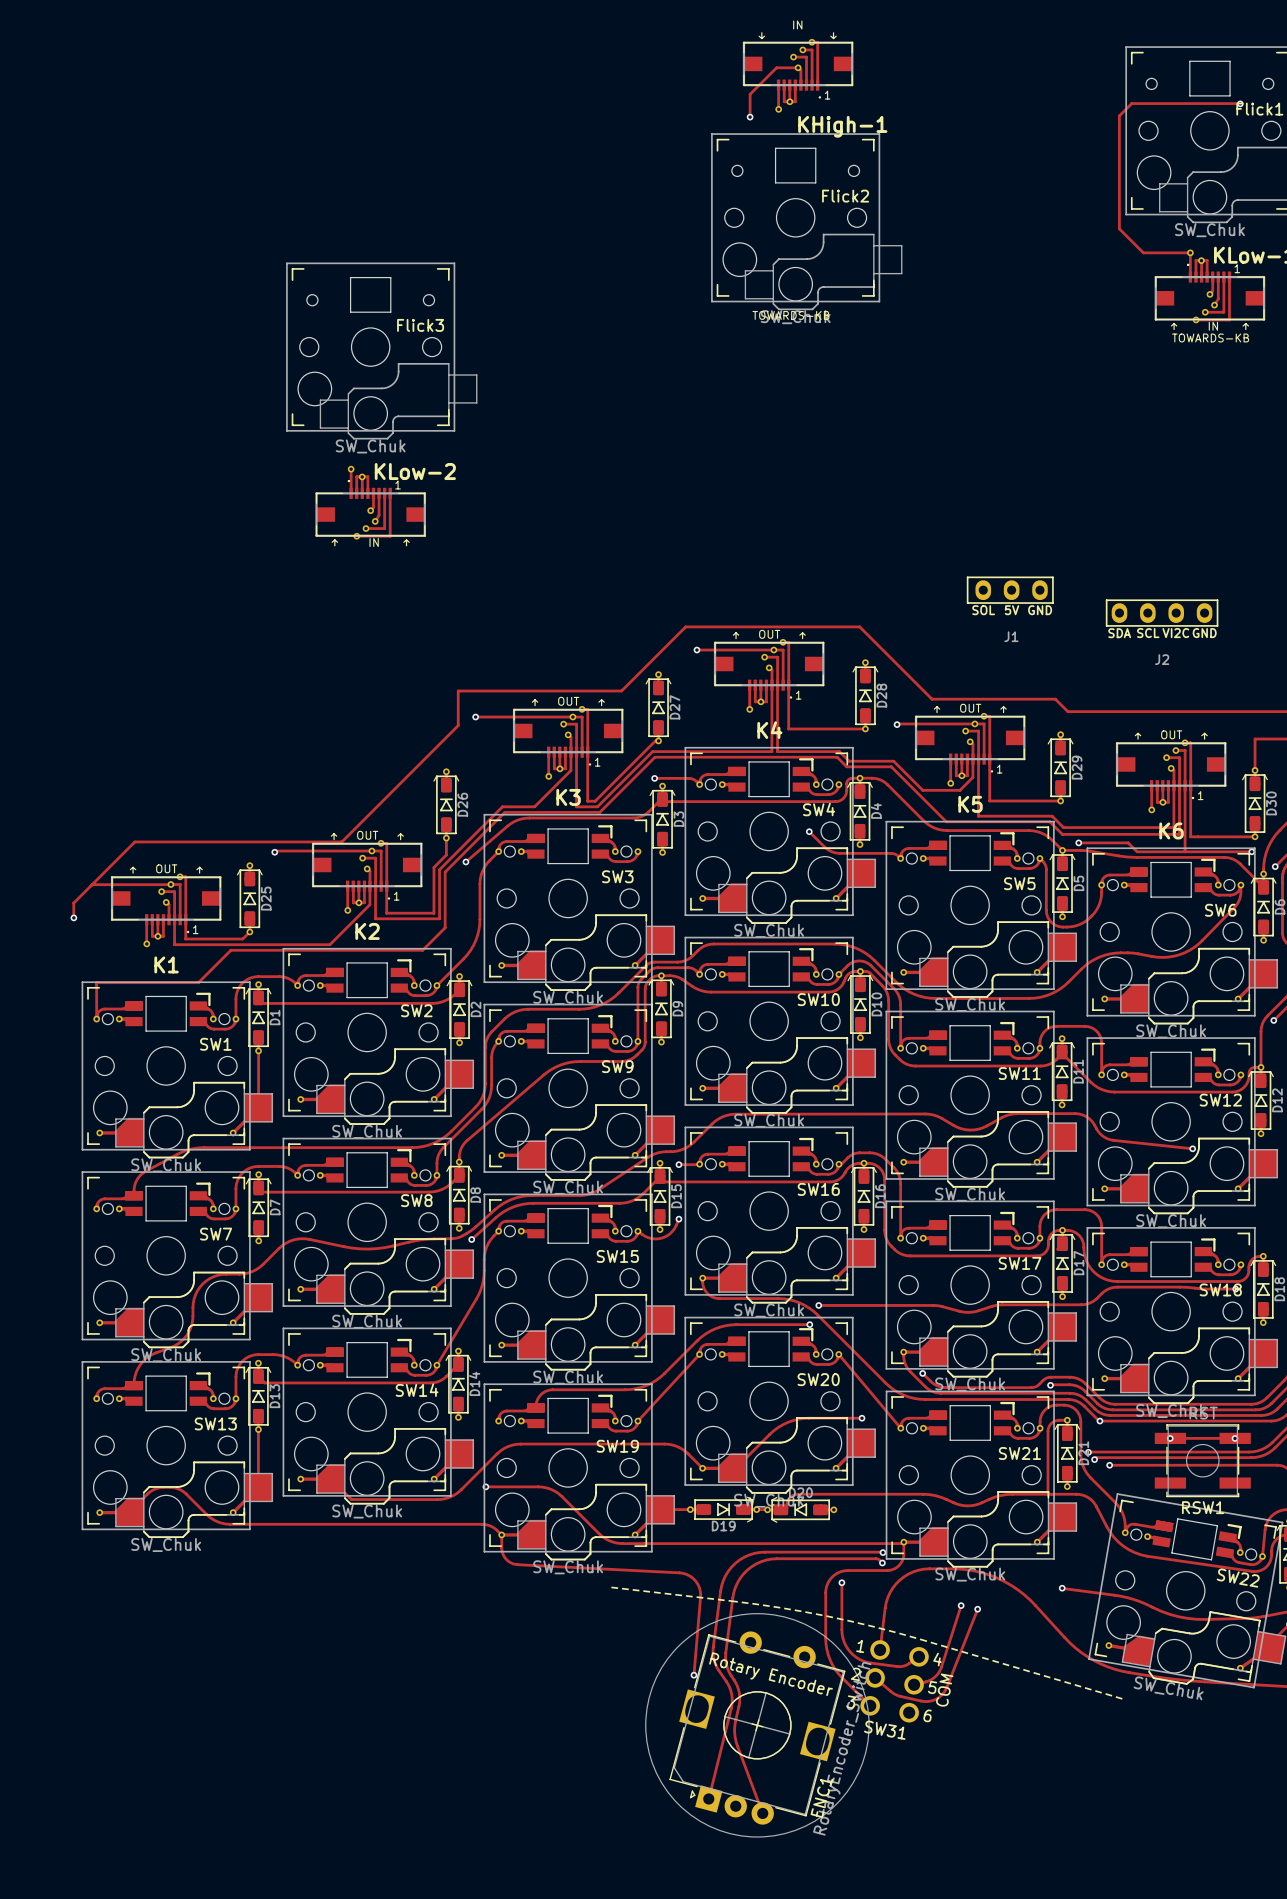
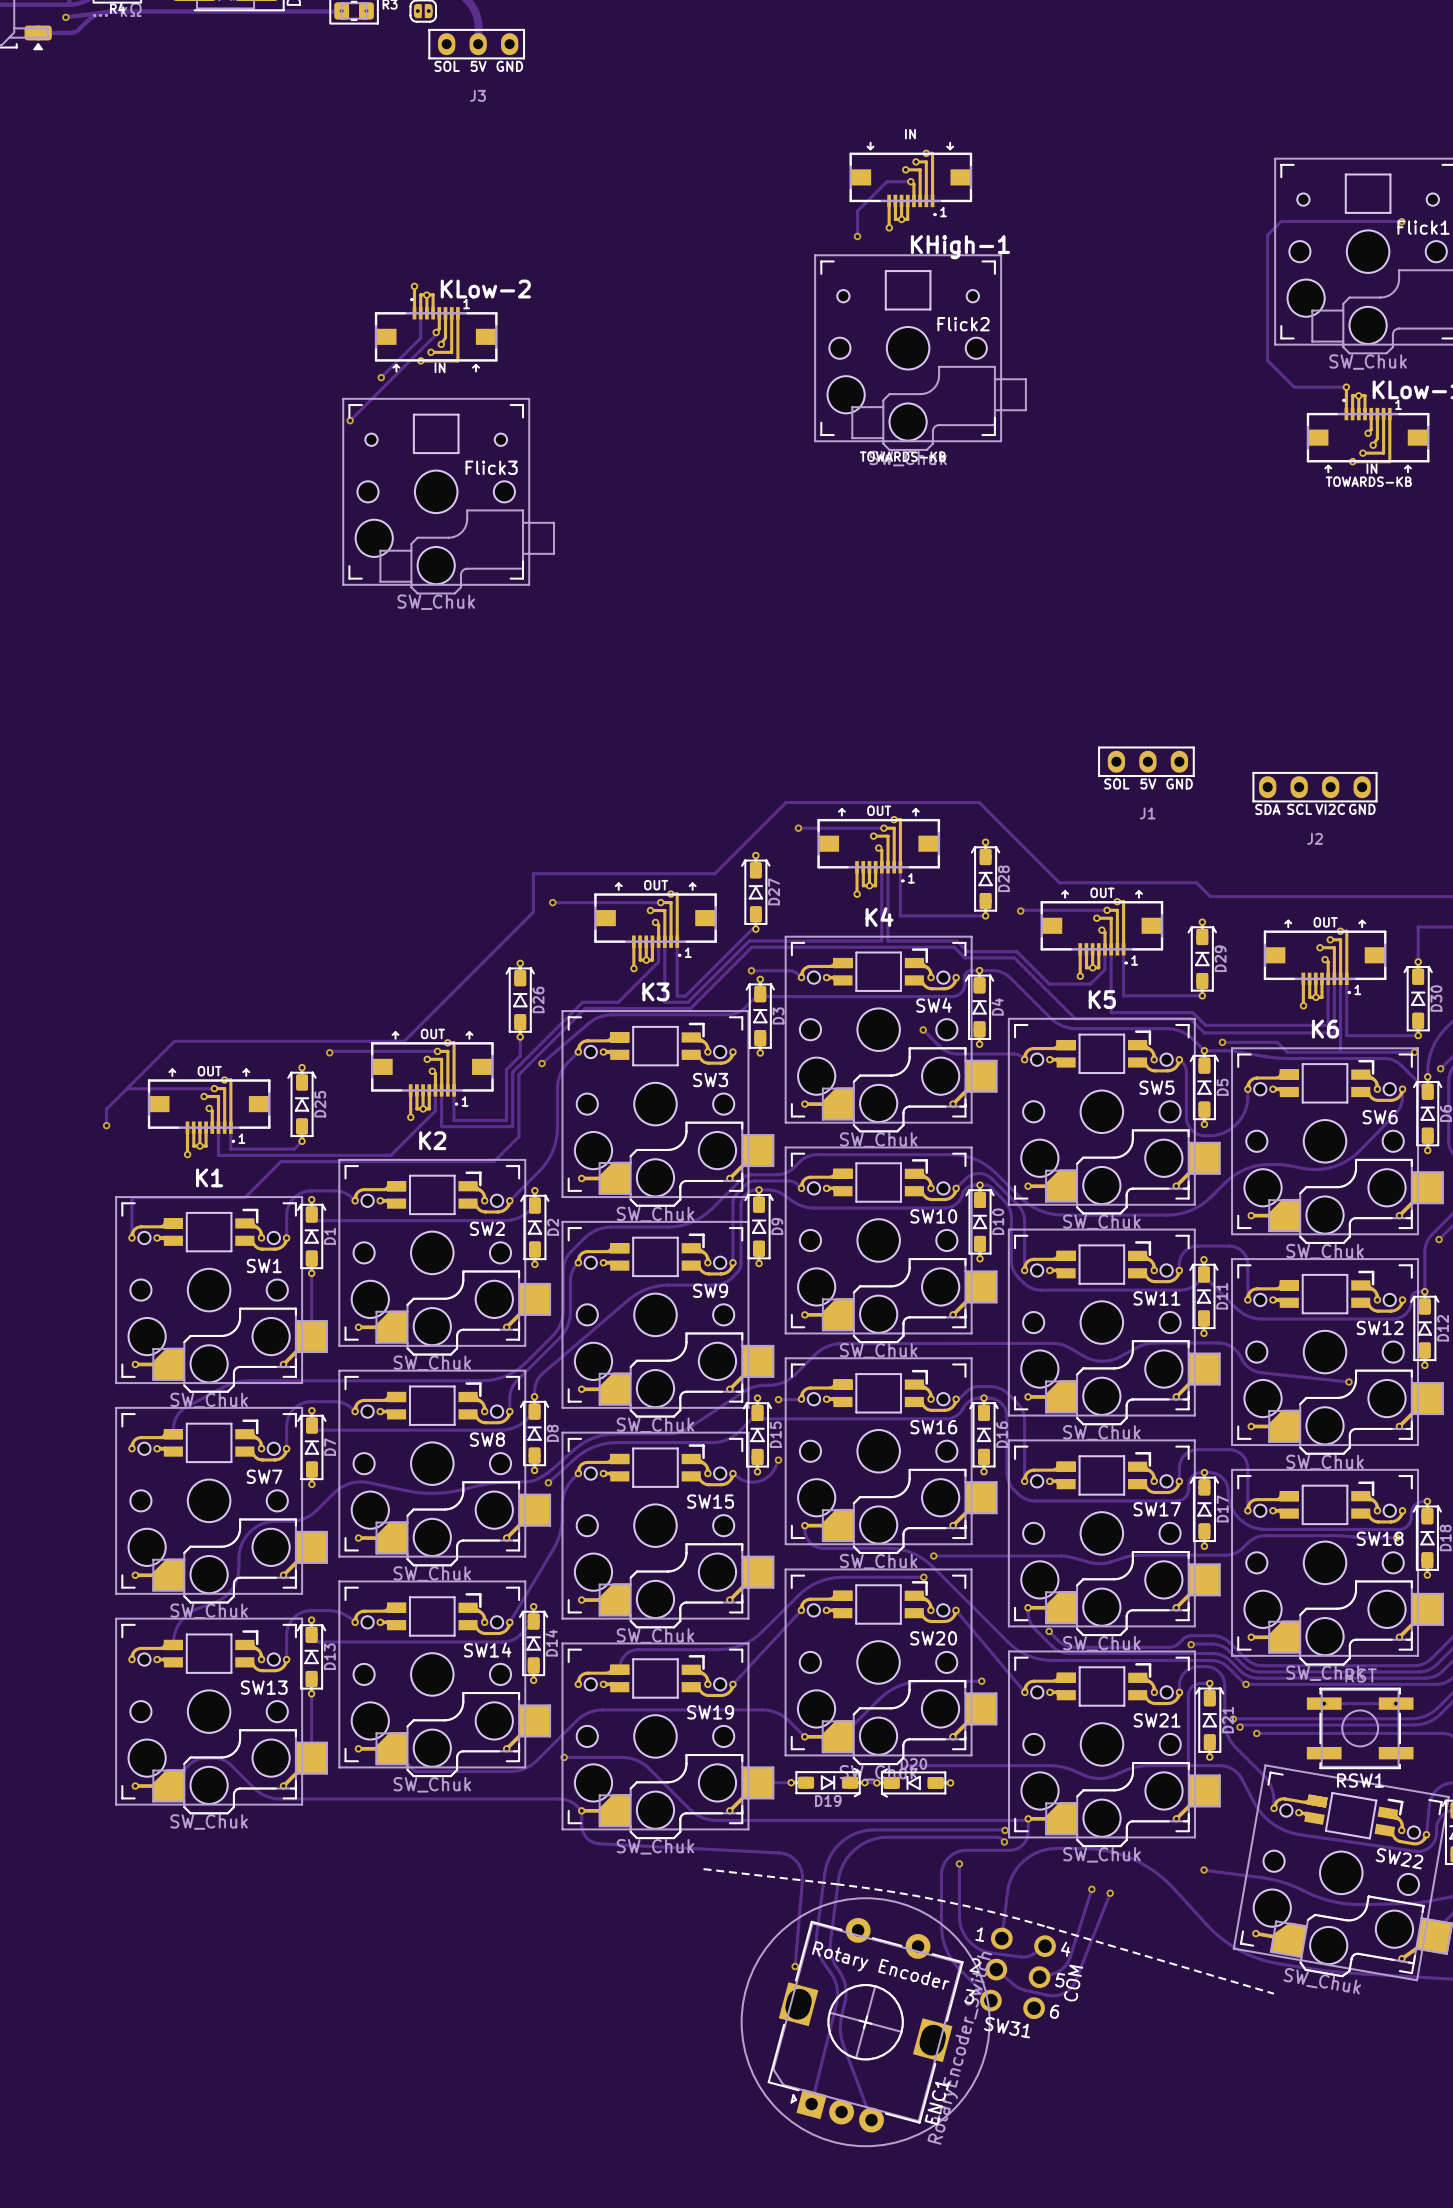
track: none -> (420, 313) (420, 338) (381, 377)
track: none -> (436, 332) (350, 420)
via: none -> (381, 377)
via: none -> (350, 420)
KLow-2 position: (370, 506) -> (436, 327)

